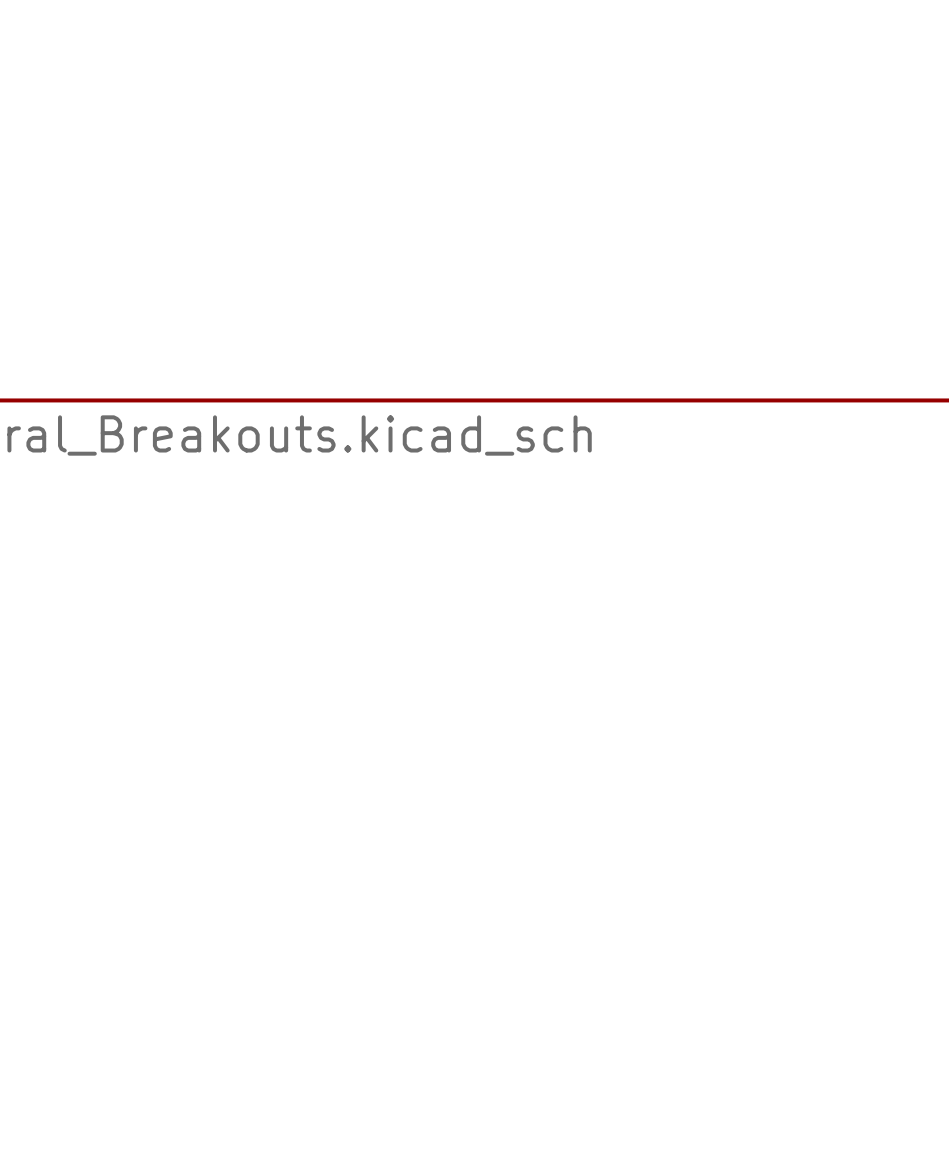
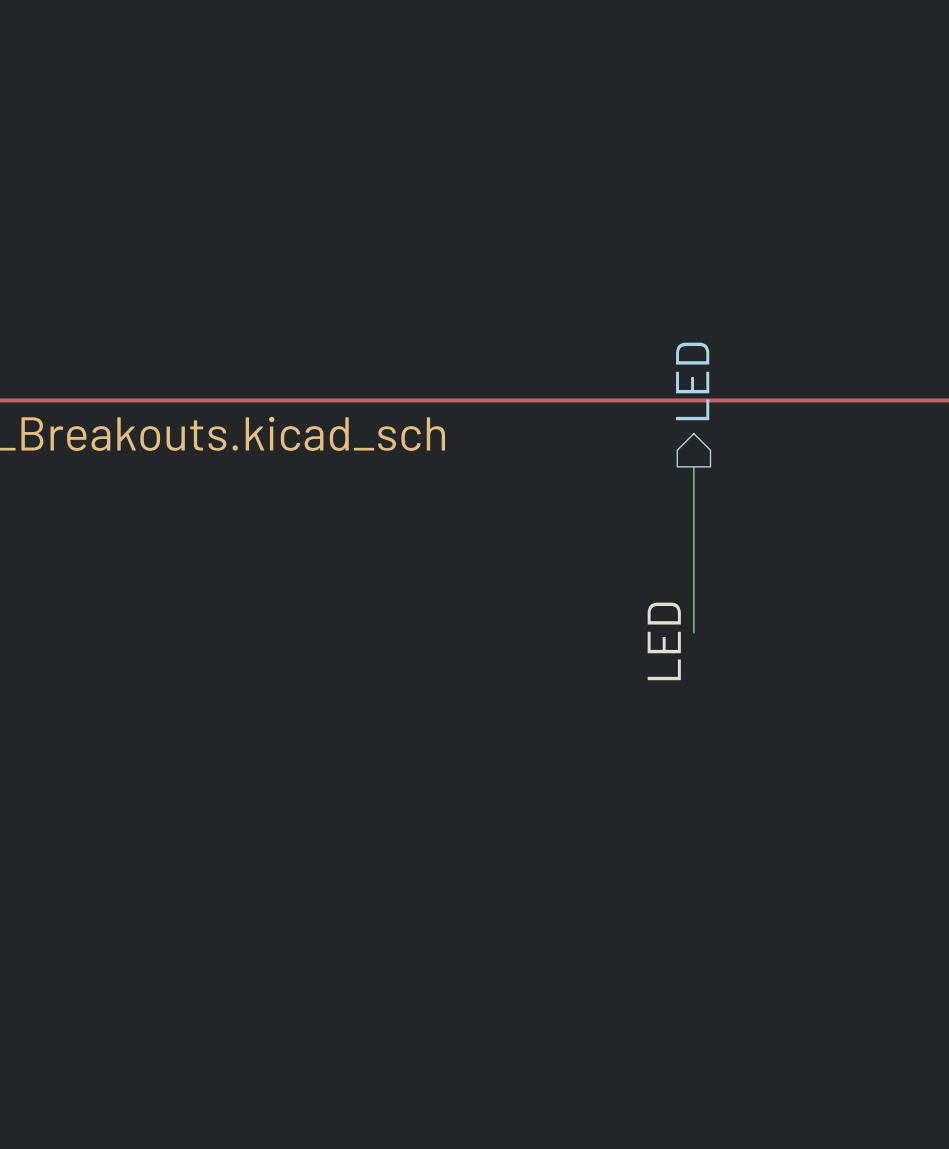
sheet pin: none -> LED (692, 381)
wire: none -> (693, 466) (693, 632)
label: none -> LED (664, 641)

